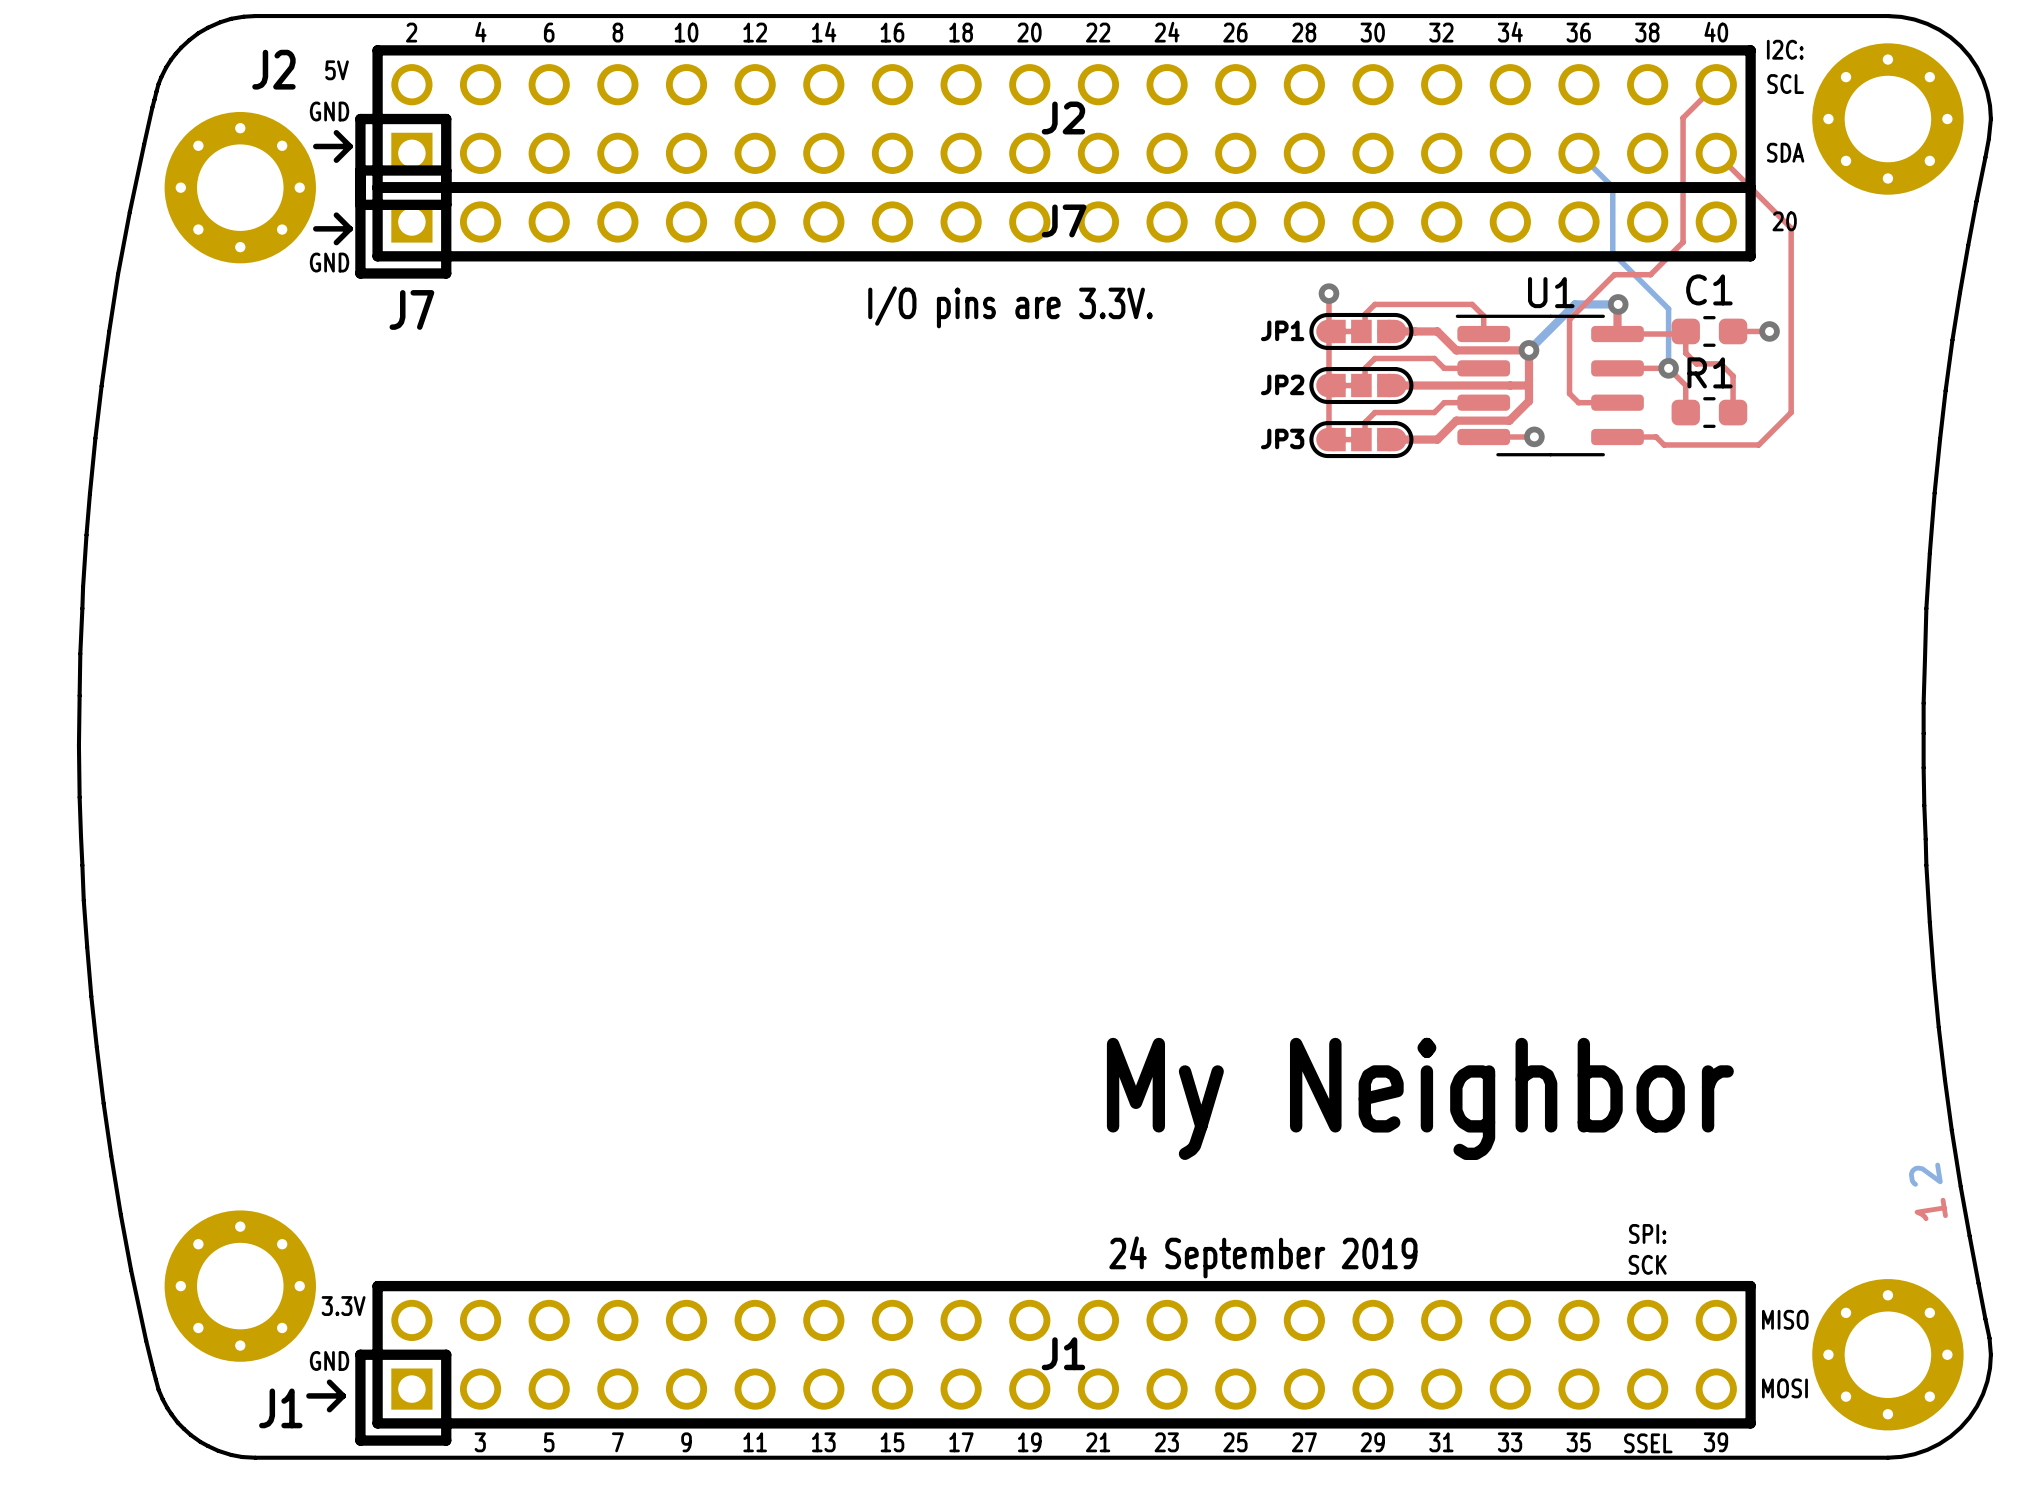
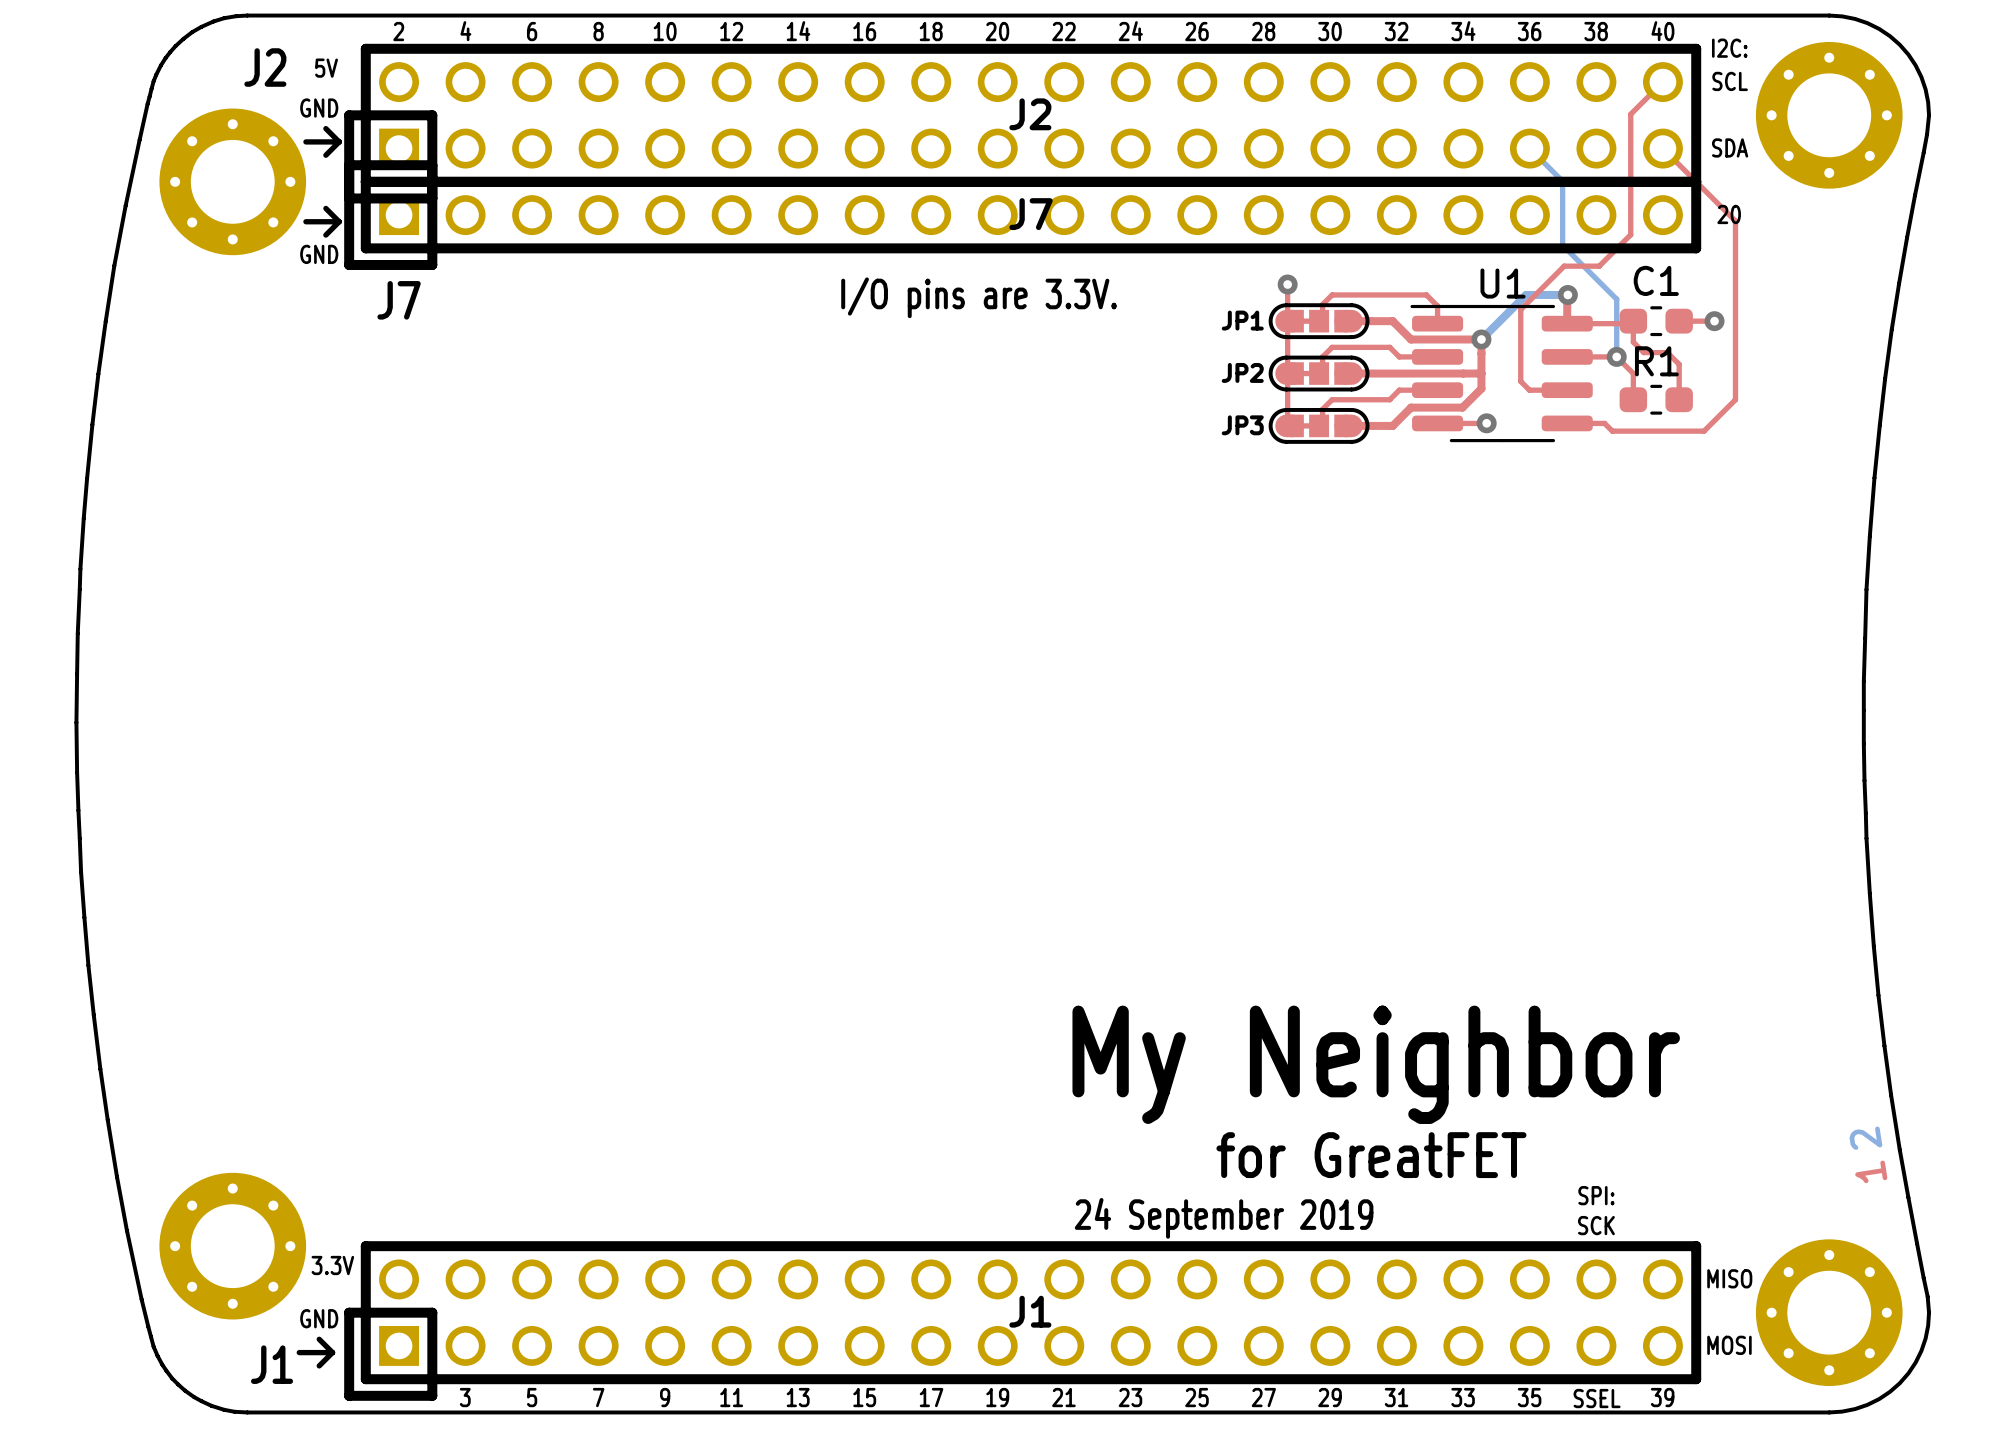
text: none -> for GreatFET (1371, 1155)

